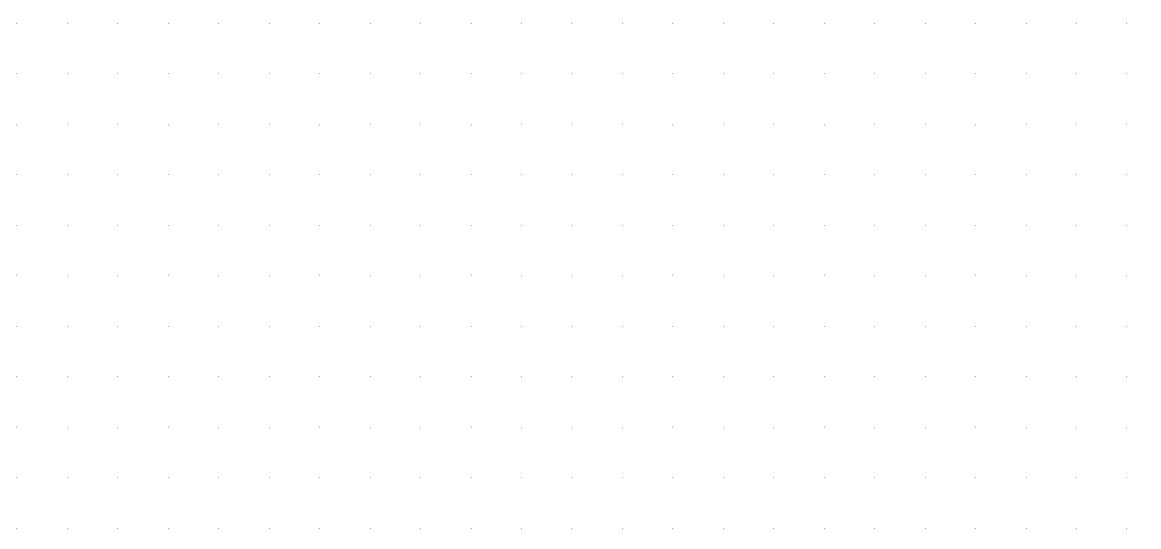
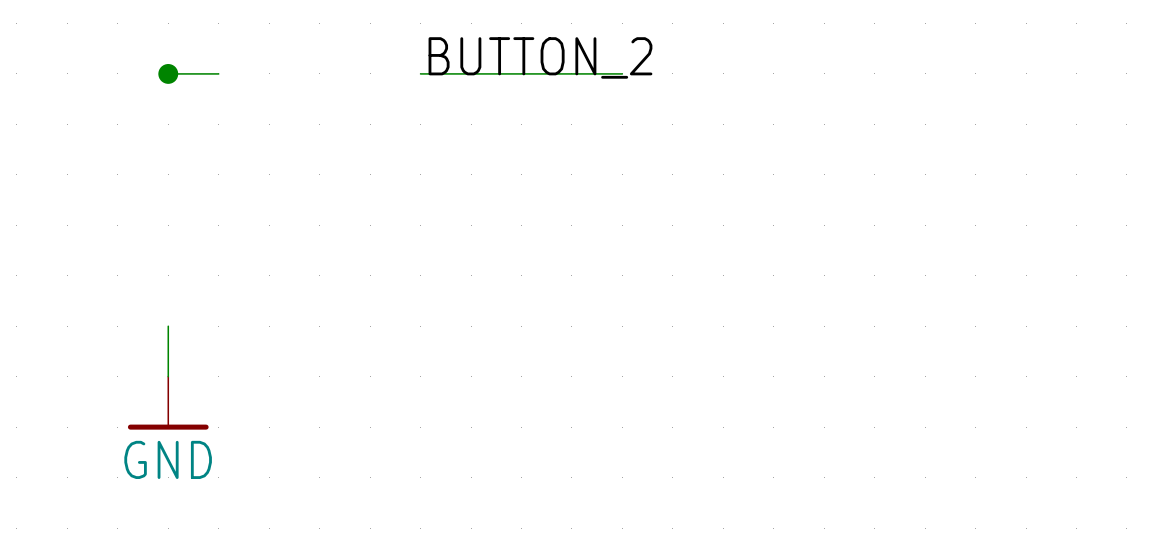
label: none -> BUTTON_2 (540, 57)
wire: none -> (168, 73) (218, 73)
junction: none -> (168, 73)
wire: none -> (420, 73) (622, 73)
wire: none -> (168, 326) (168, 376)
power symbol: none -> GND (168, 403)

